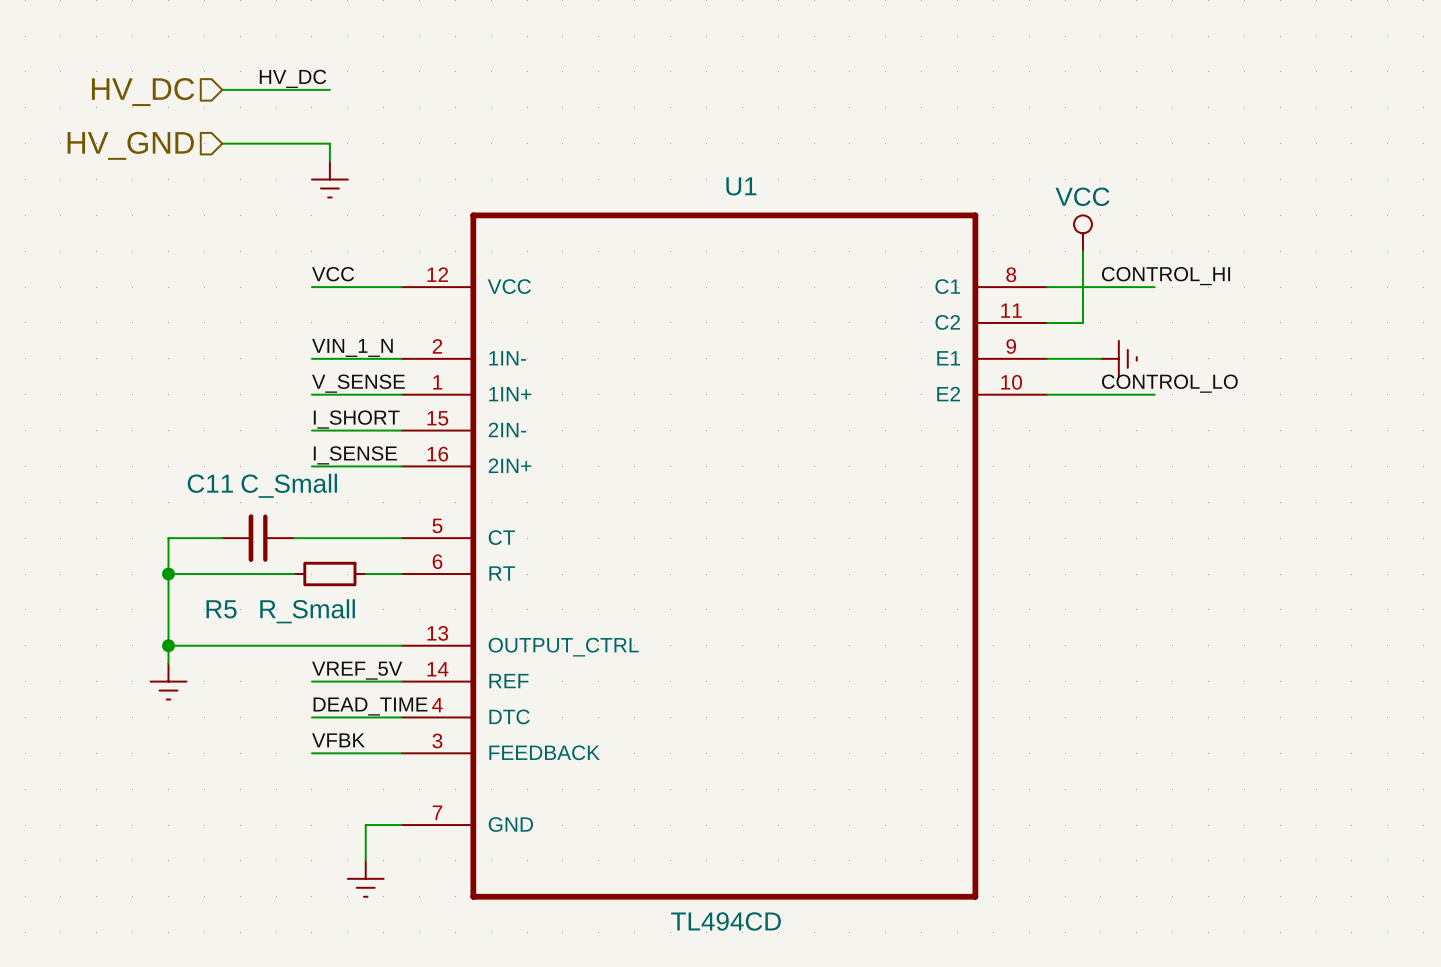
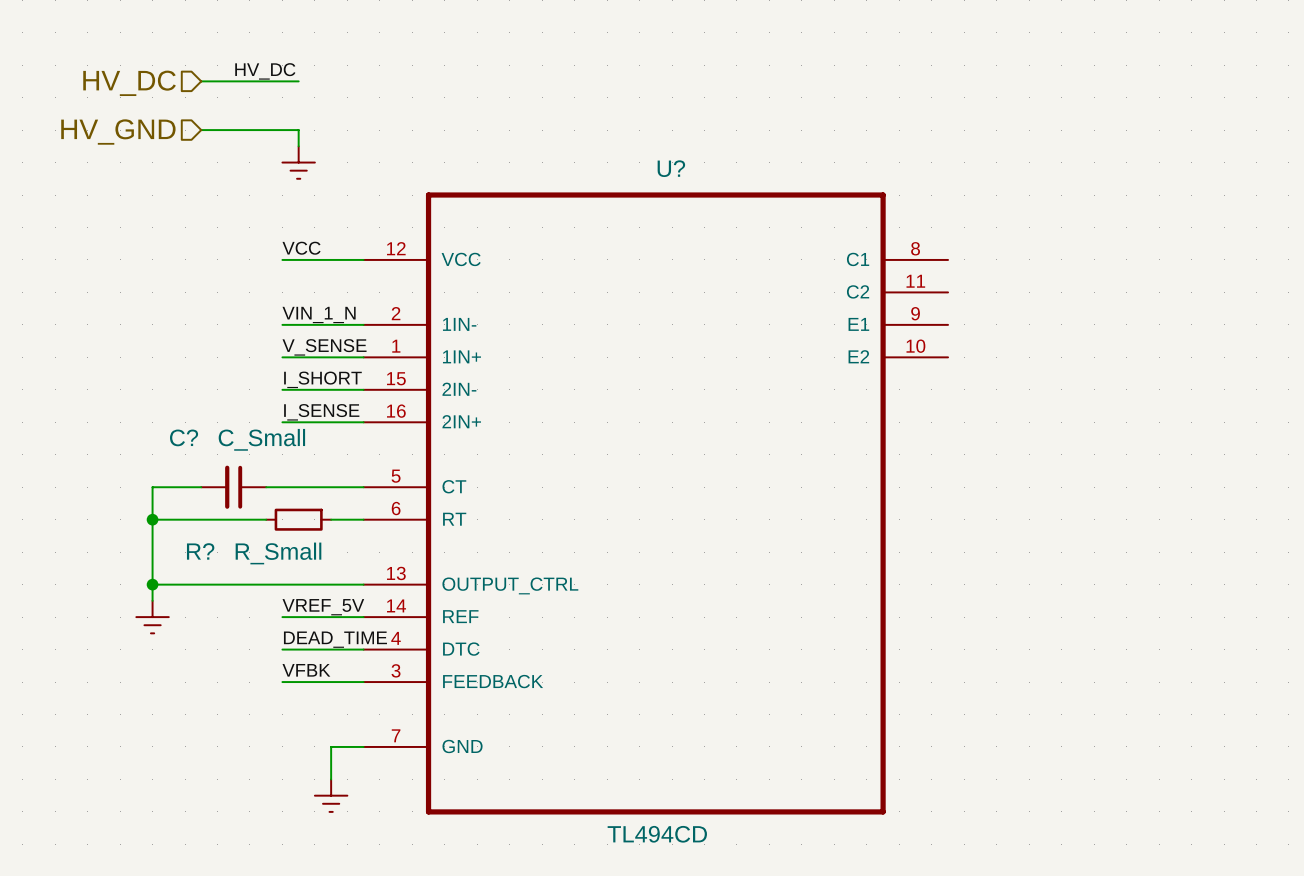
U1 name: U1 (741, 186) -> U? (671, 168)
power symbol: VCC (1082, 233) -> none
wire: (1082, 251) (1082, 322) (1047, 322) -> none
label: CONTROL_HI (1166, 276) -> none
wire: (1047, 287) (1154, 287) -> none
wire: (1047, 358) (1100, 358) -> none
power symbol: (1118, 358) -> none
label: CONTROL_LO (1169, 383) -> none
wire: (1047, 394) (1154, 394) -> none
C11 name: C11 (210, 483) -> C? (184, 437)
R5 name: R5 (221, 609) -> R? (200, 551)

